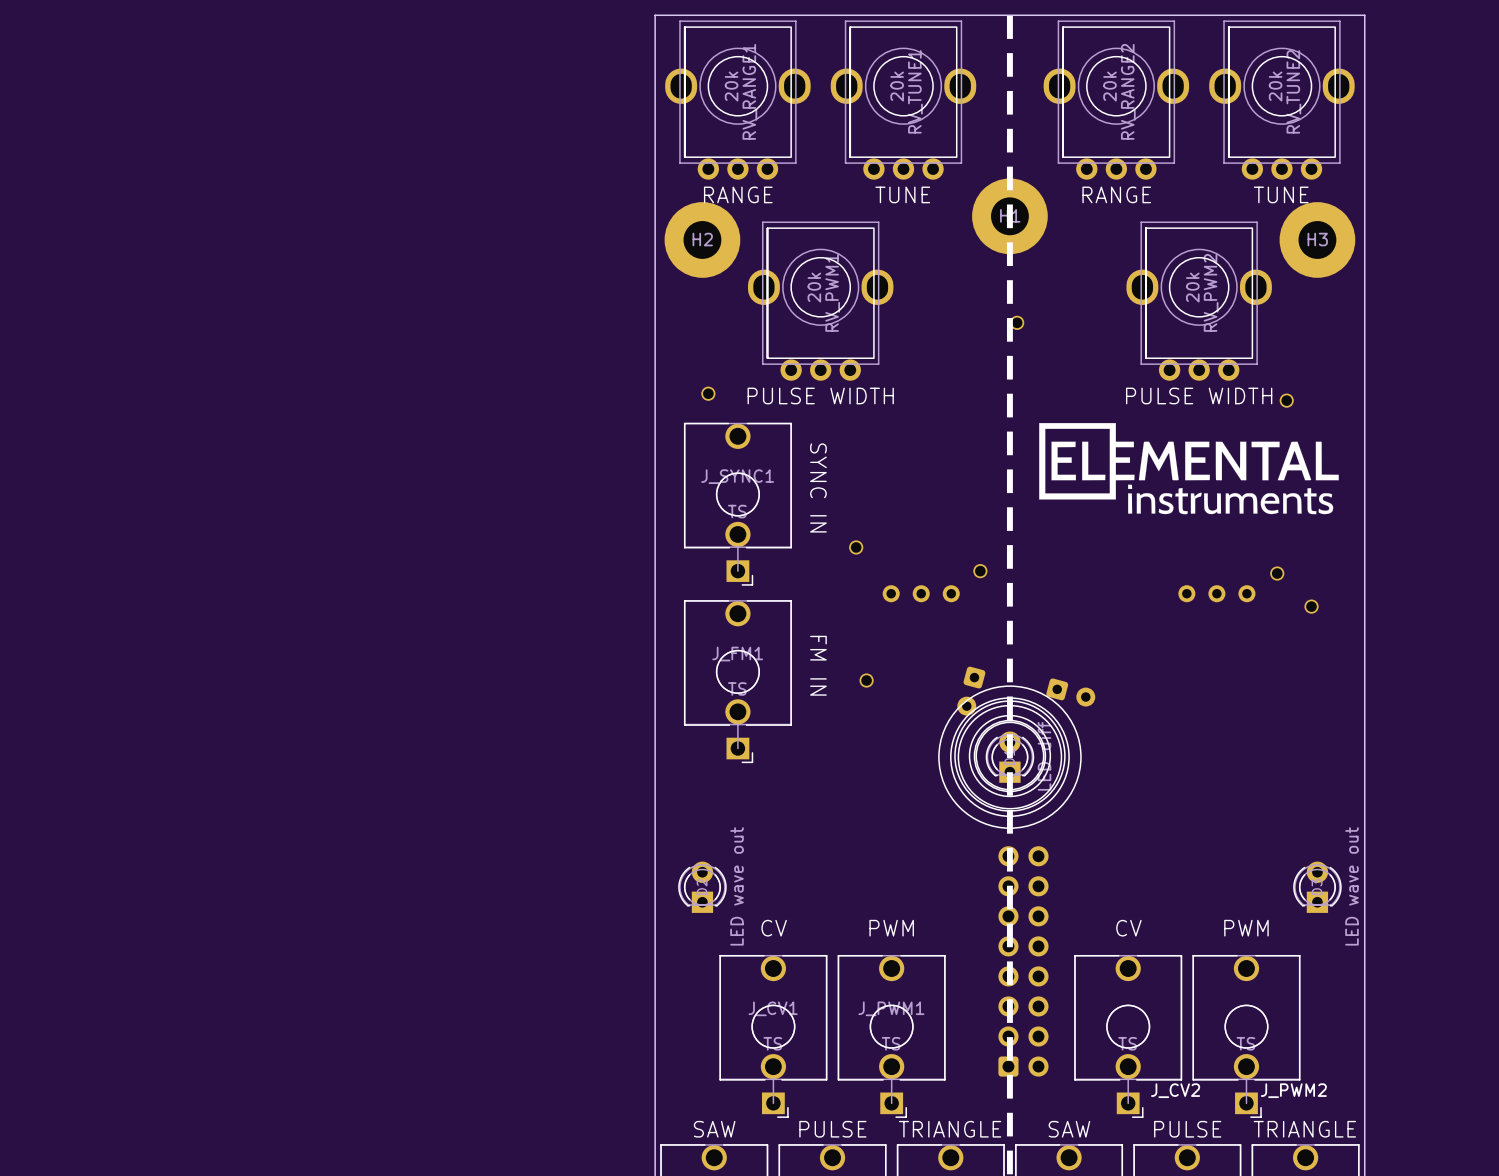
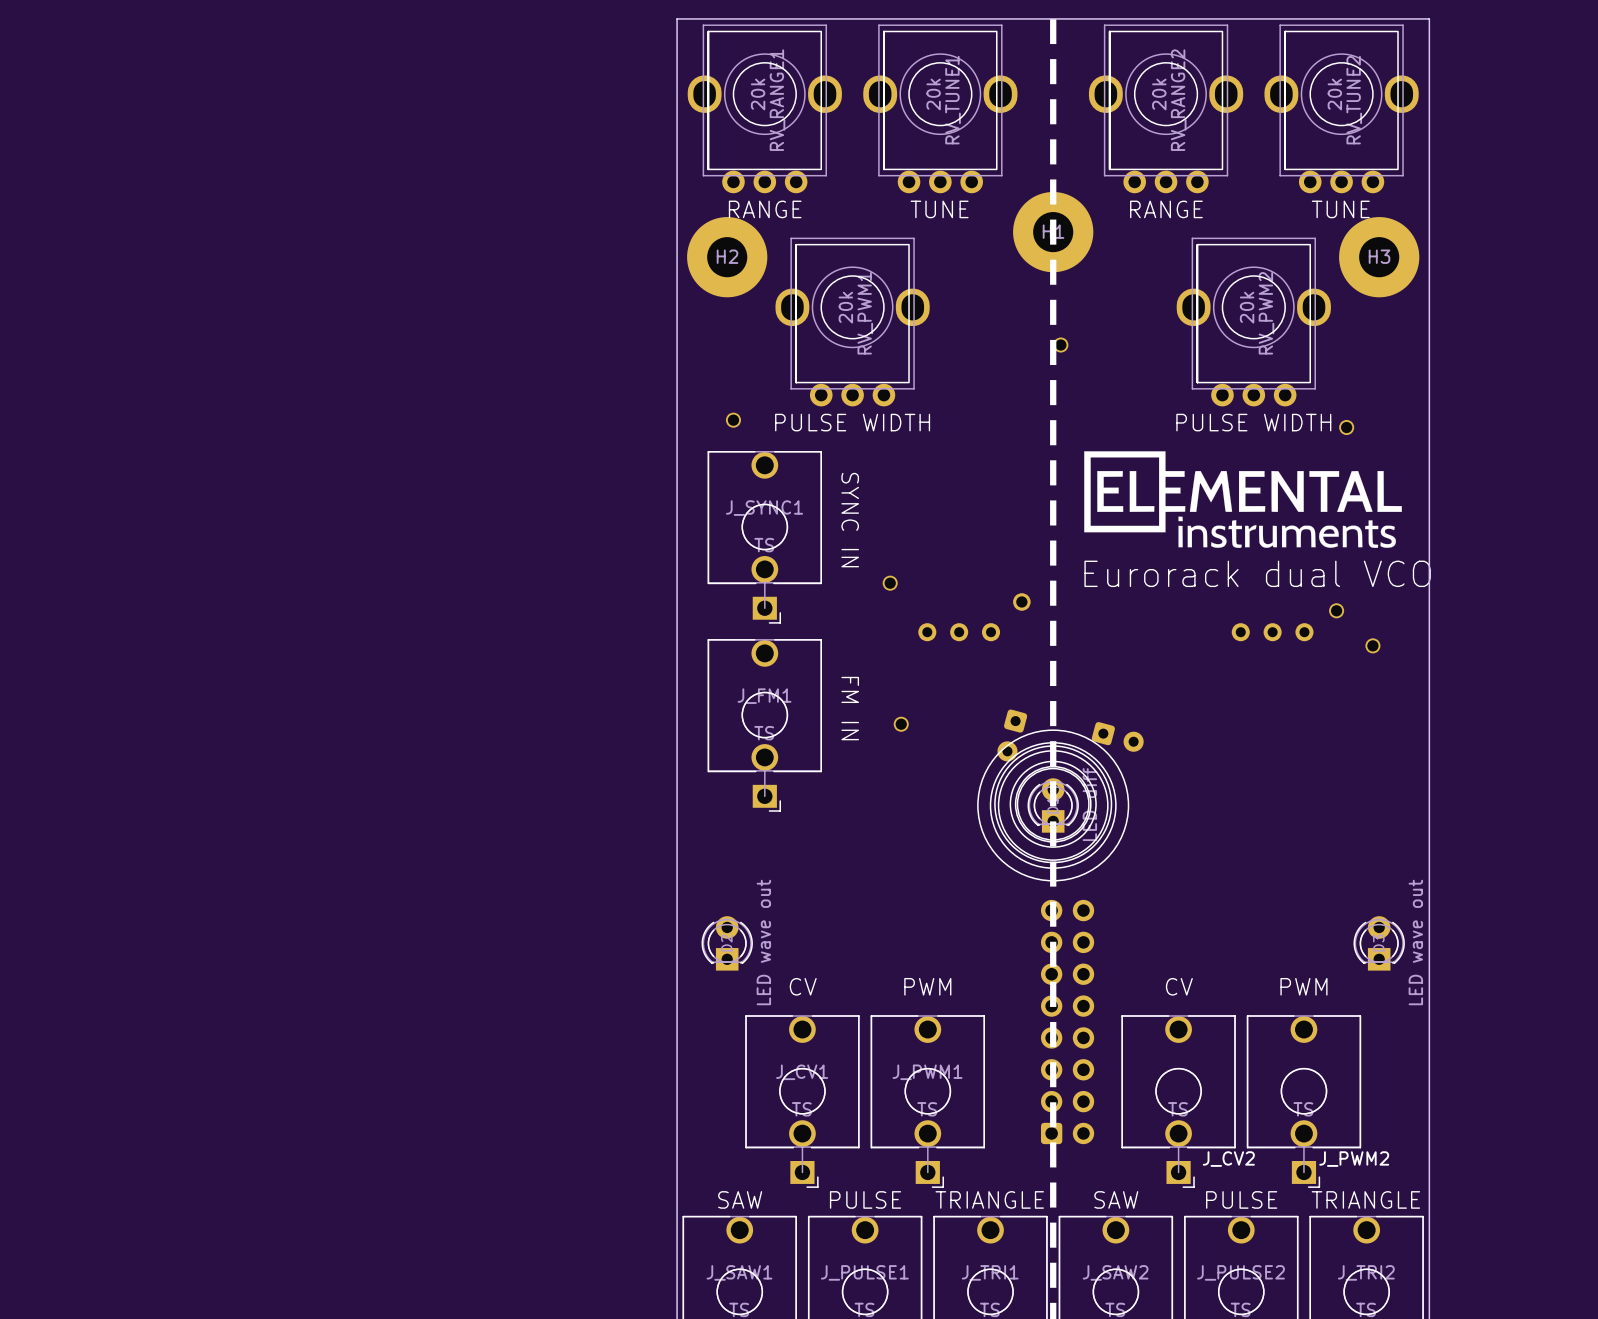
text: none -> Eurorack dual VCO (1257, 573)
part footprint: [973, 564, 988, 579] -> [1013, 593, 1031, 611]

